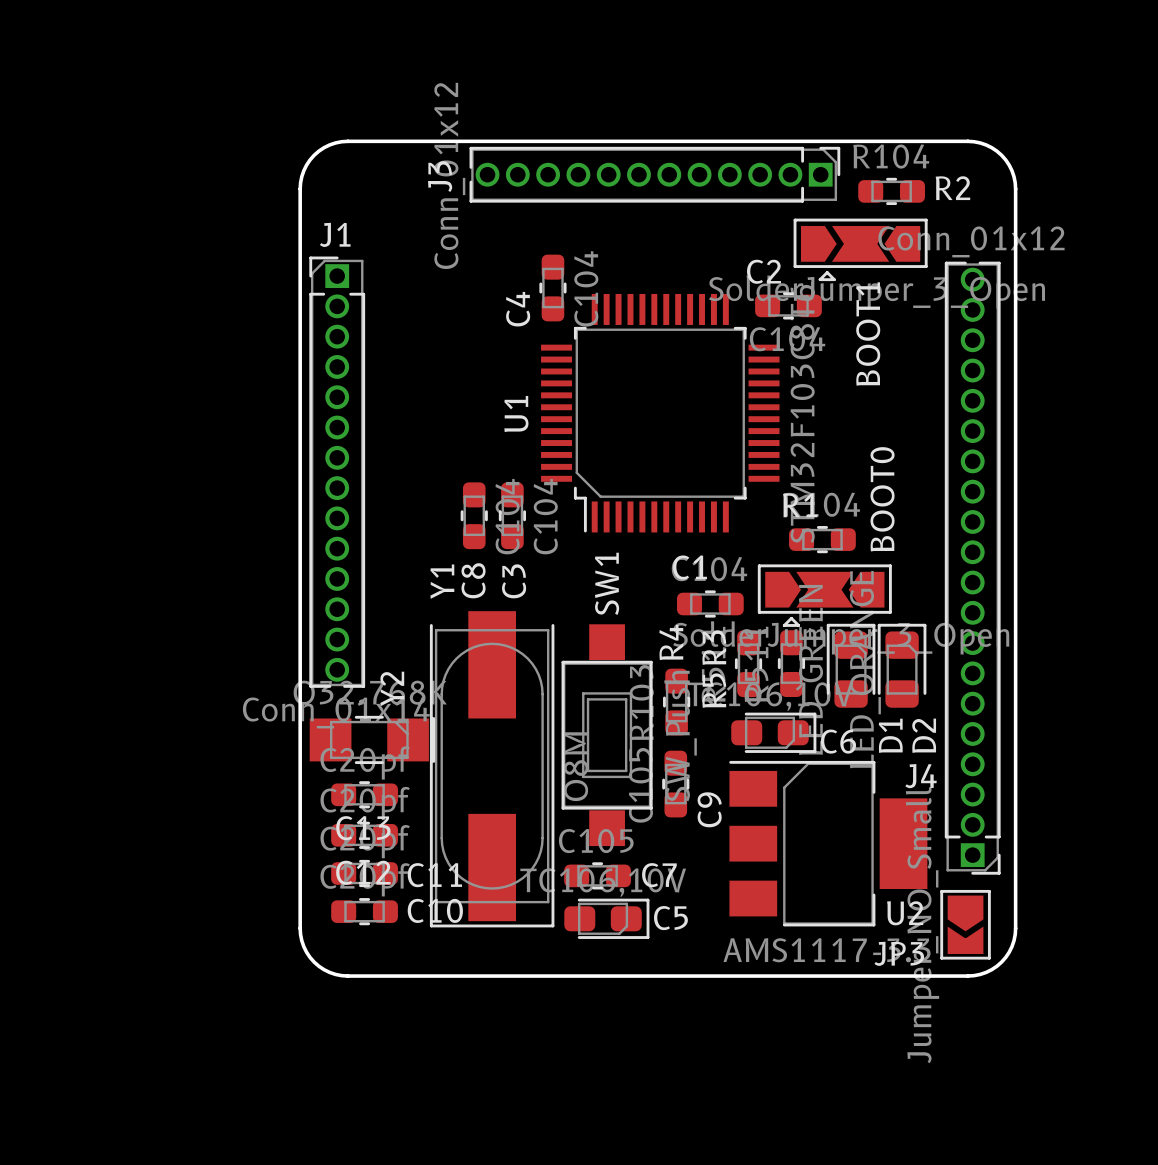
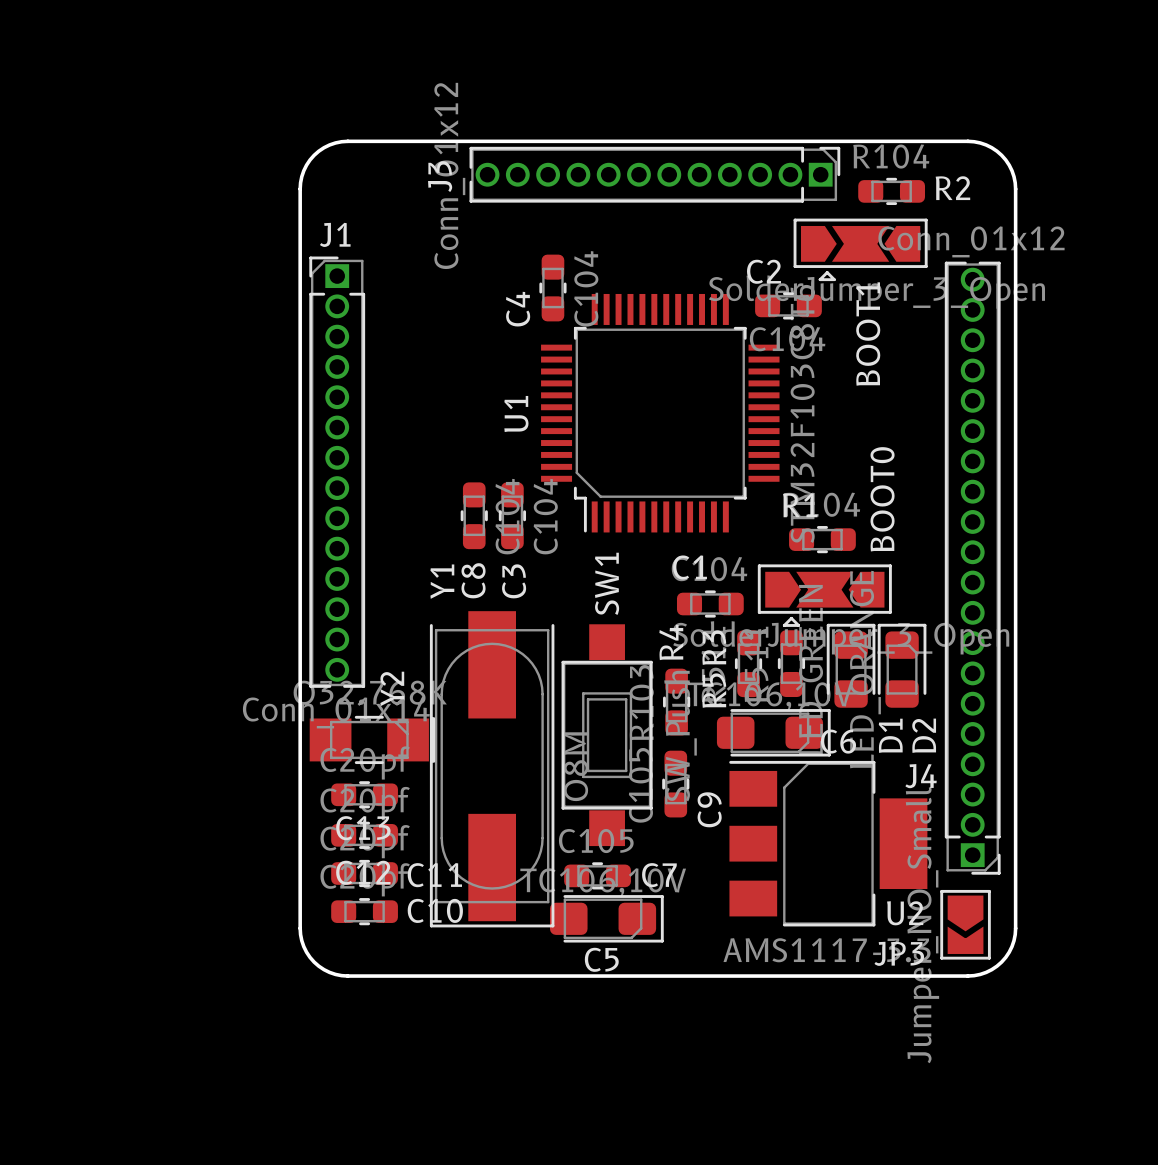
C6 footprint: [731, 712, 817, 753] -> [716, 709, 831, 757]
C5 footprint: [564, 898, 650, 939] -> [549, 895, 664, 943]
C5 name position: C5 (670, 918) -> C5 (601, 959)

